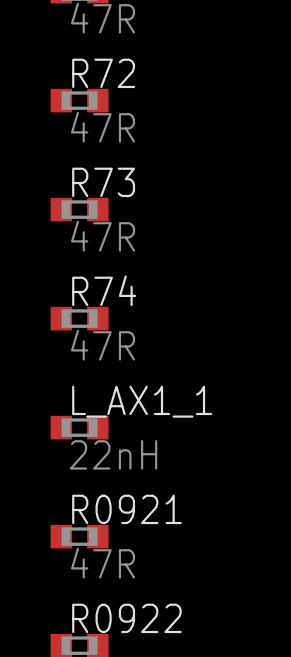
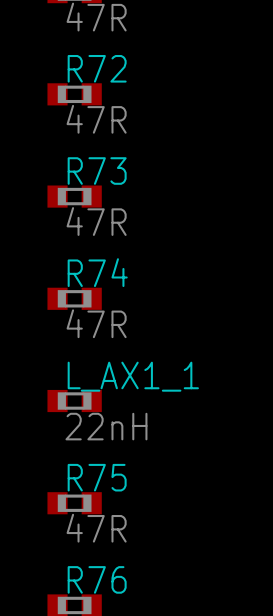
R0921 name: R0921 (126, 509) -> R75 (97, 477)
R0922 name: R0922 (126, 618) -> R76 (97, 579)

